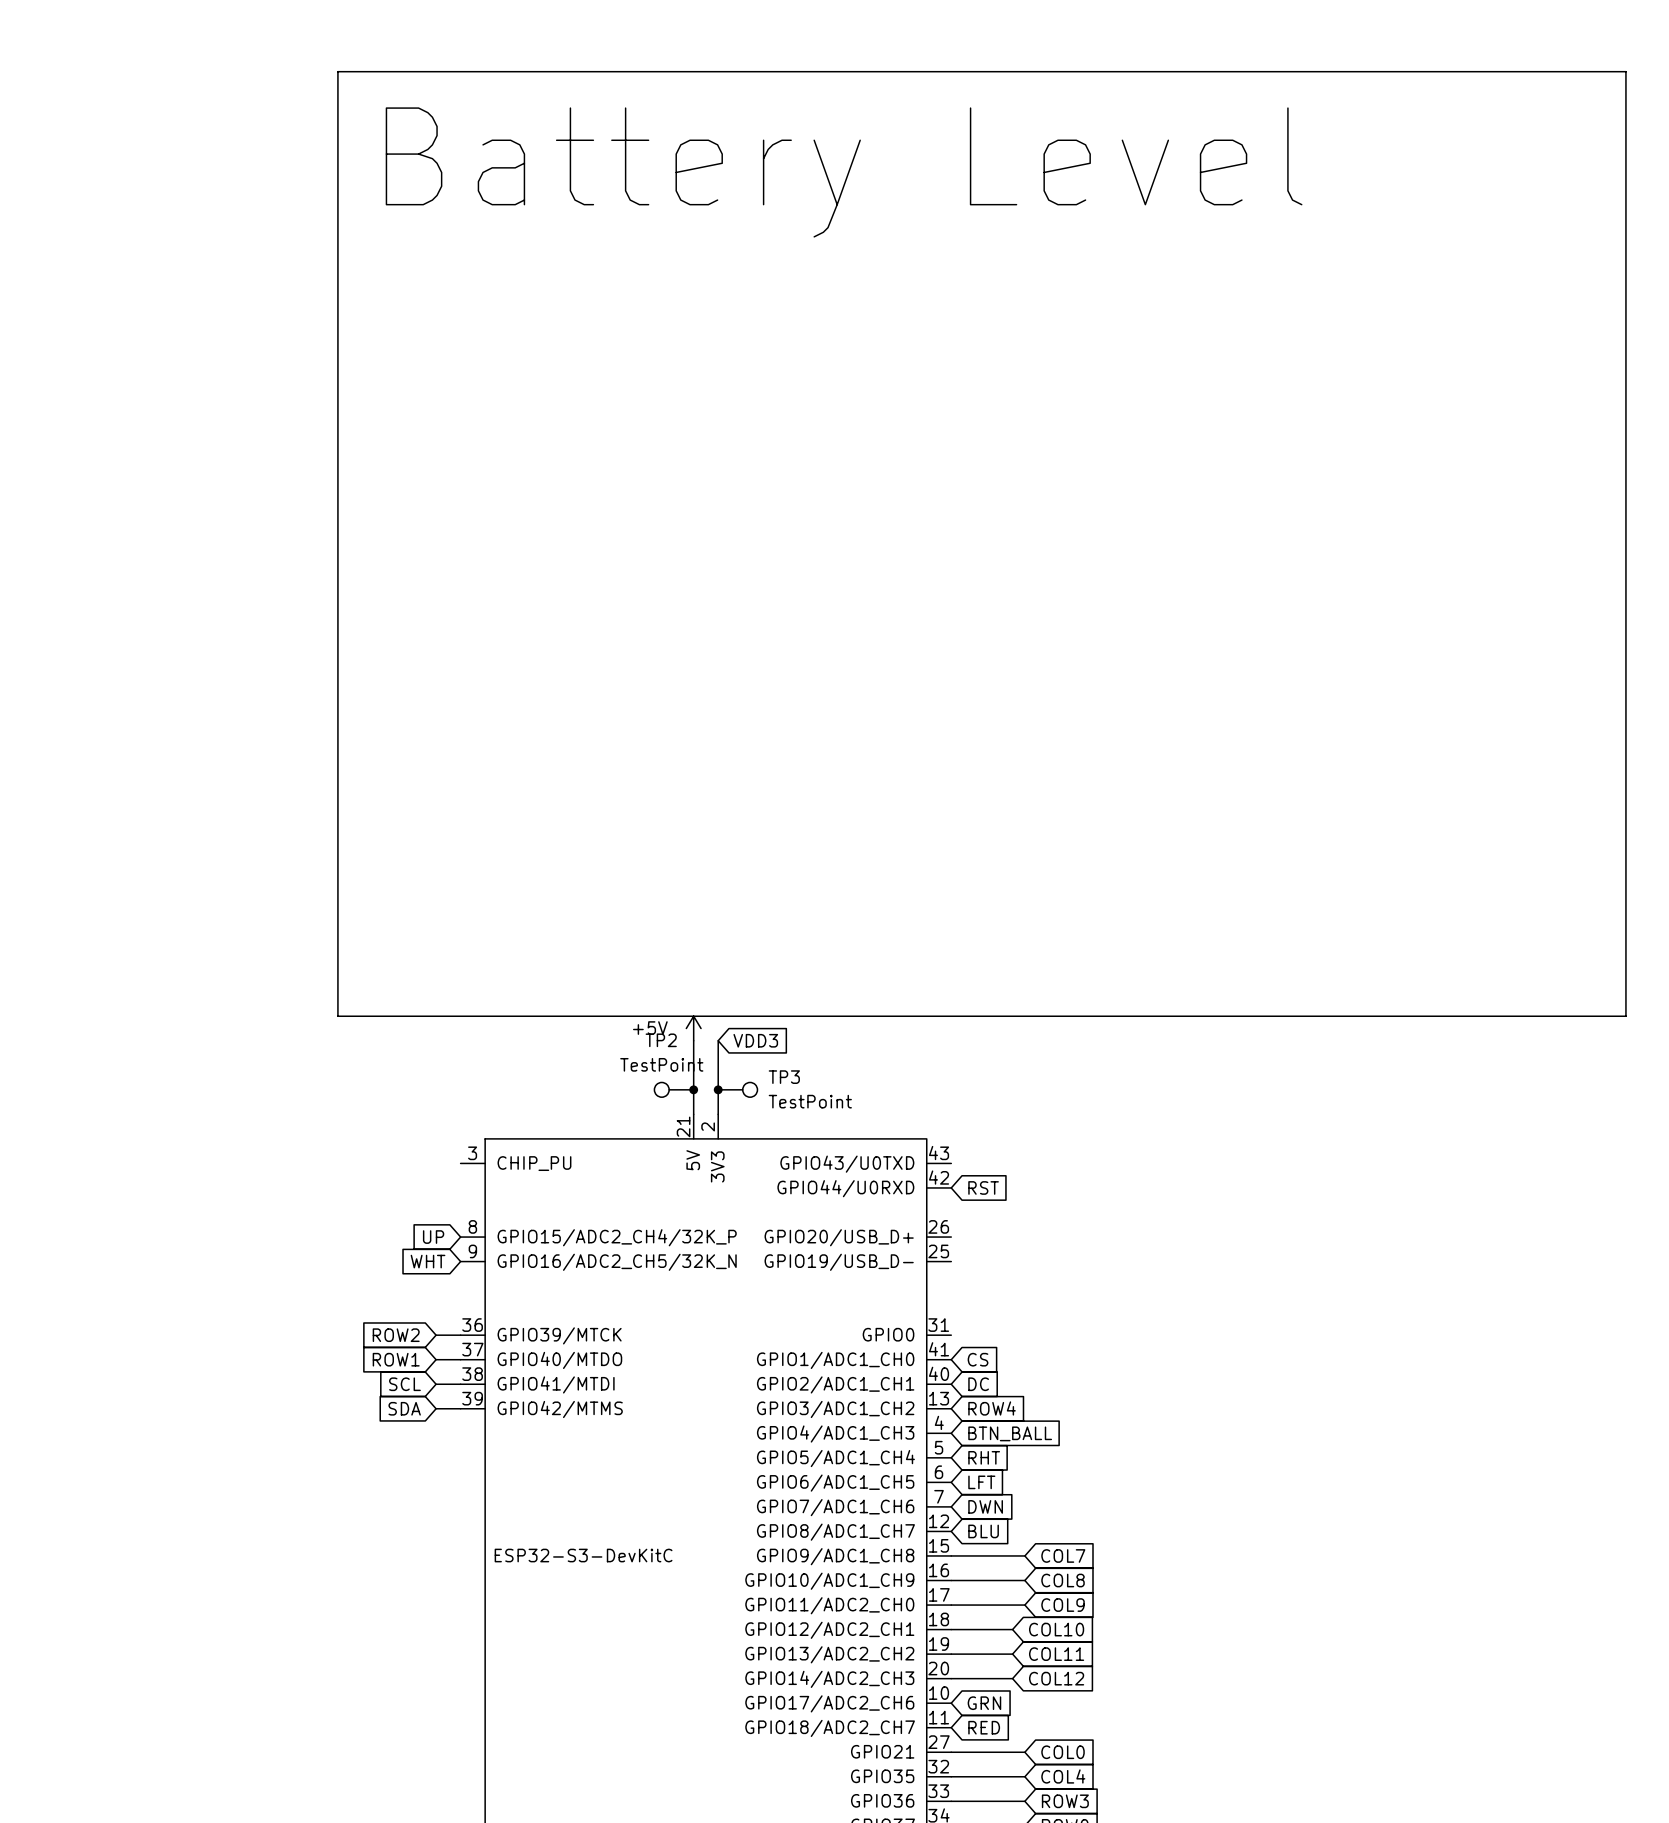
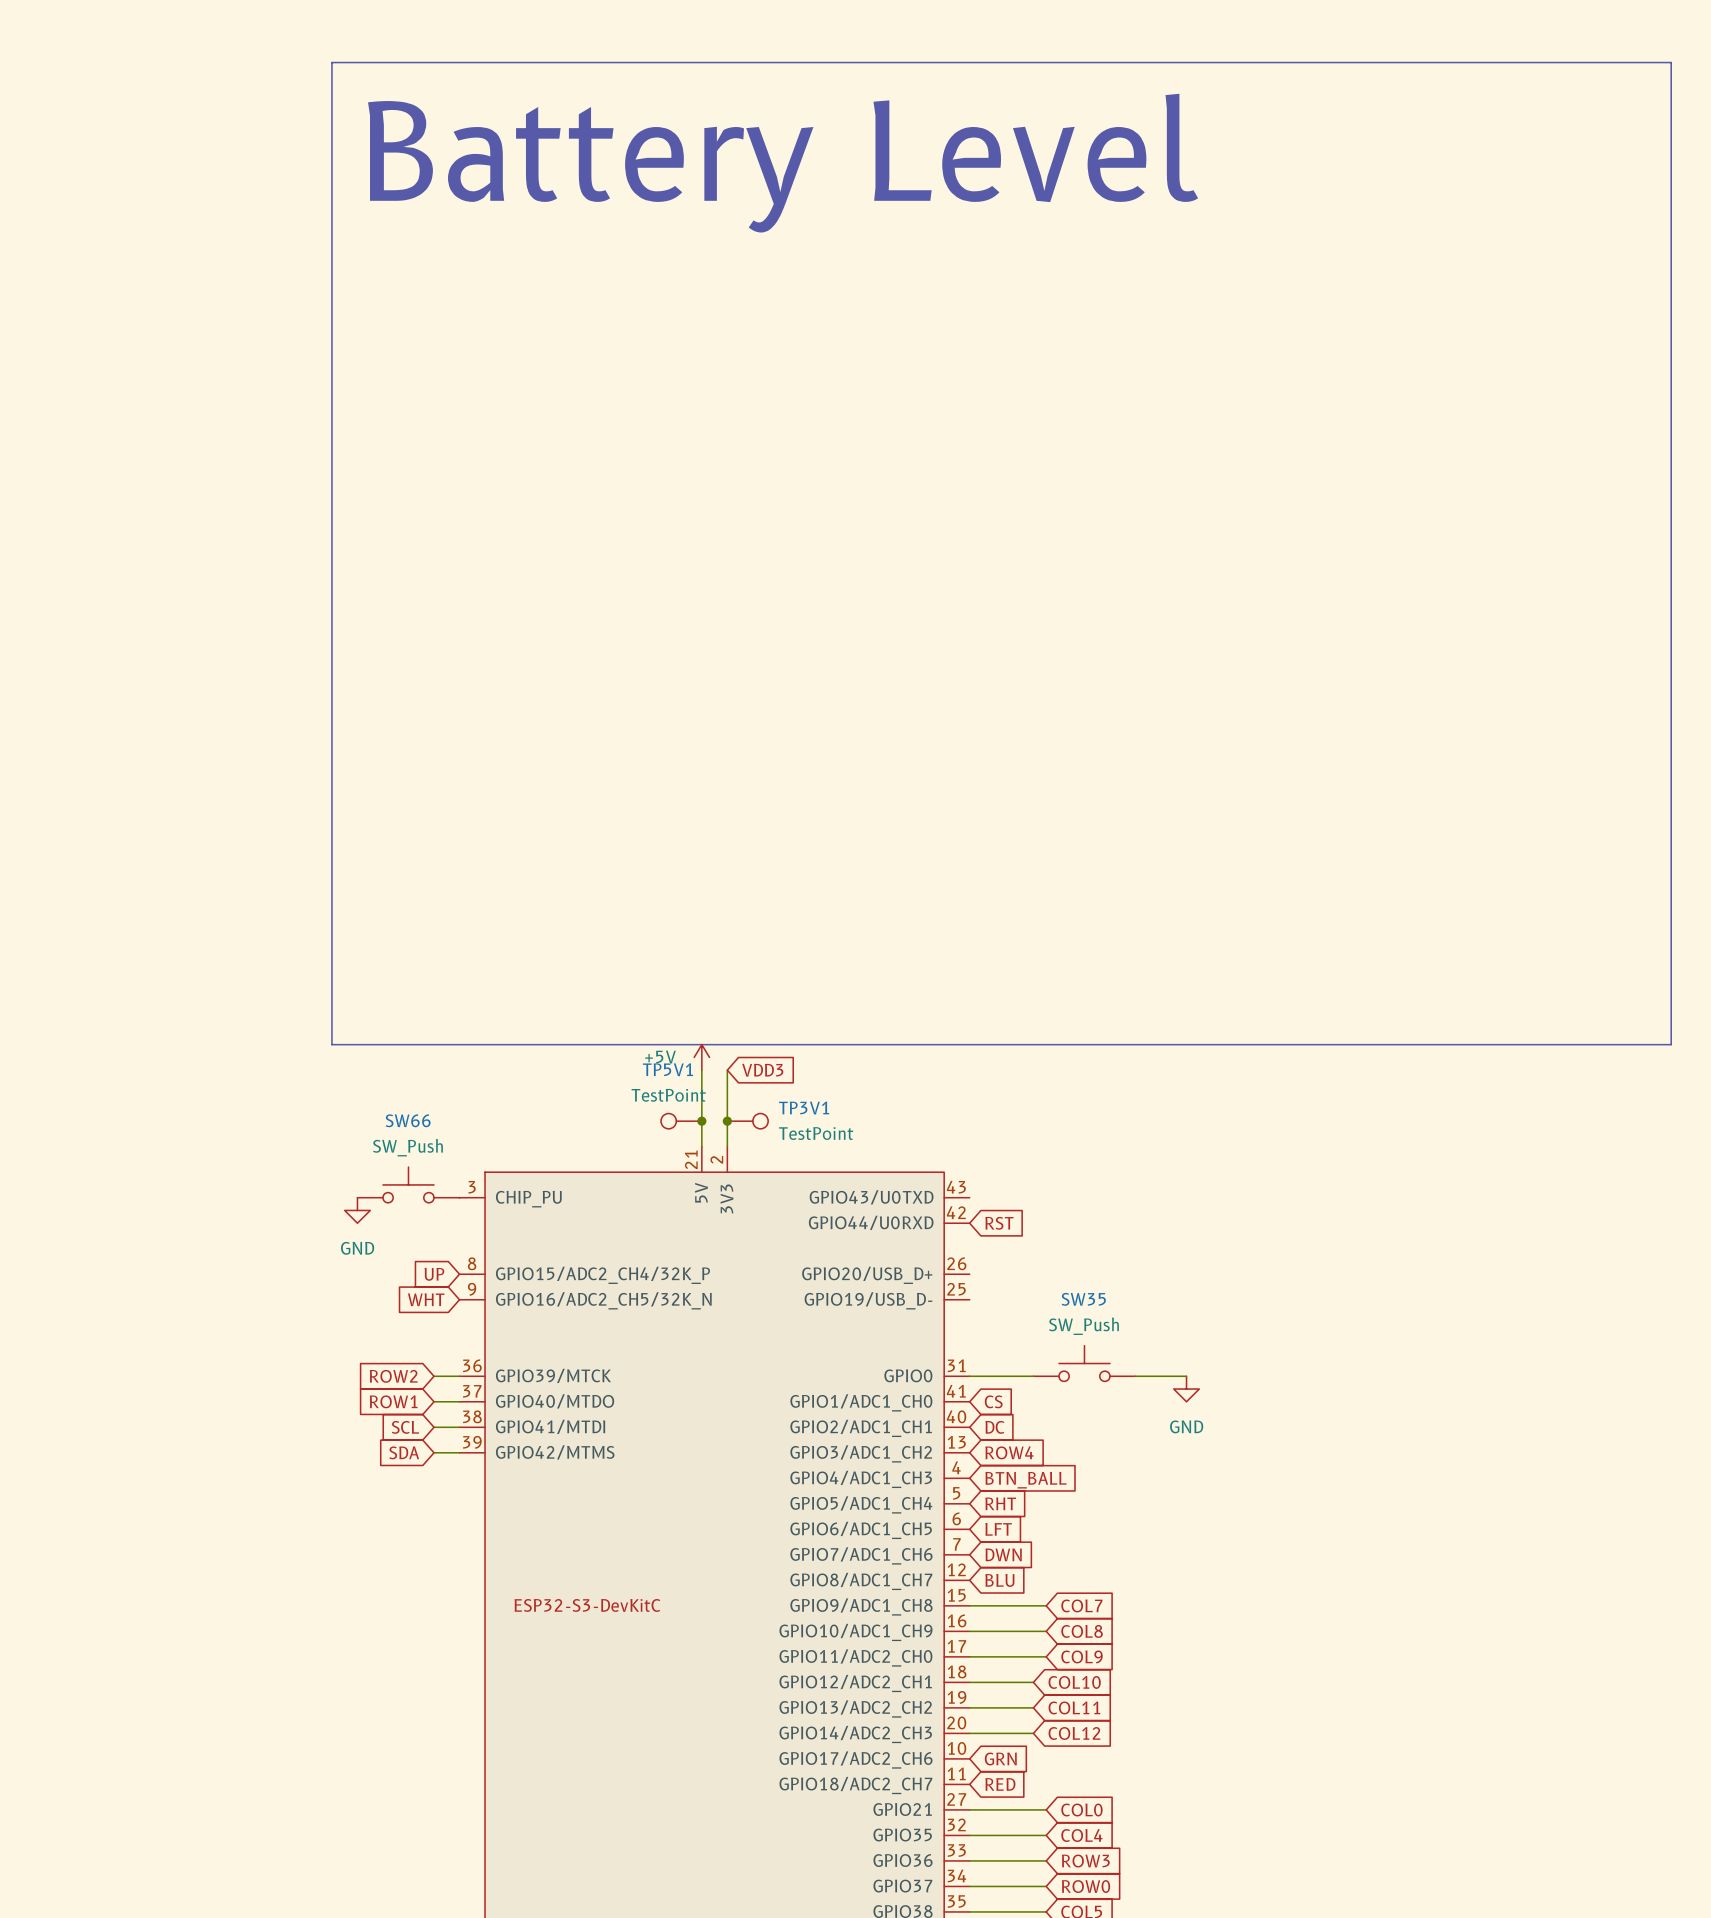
TP2 name: TP2 (661, 1040) -> TP5V1 (667, 1069)
TP3 name: TP3 (784, 1077) -> TP3V1 (804, 1108)
SW66: none -> SW_Push (408, 1184)
power symbol: none -> GND (357, 1210)
SW35: none -> SW_Push (1084, 1363)
wire: none -> (969, 1376) (1033, 1376)
wire: none -> (1135, 1376) (1186, 1376)
power symbol: none -> GND (1186, 1389)

